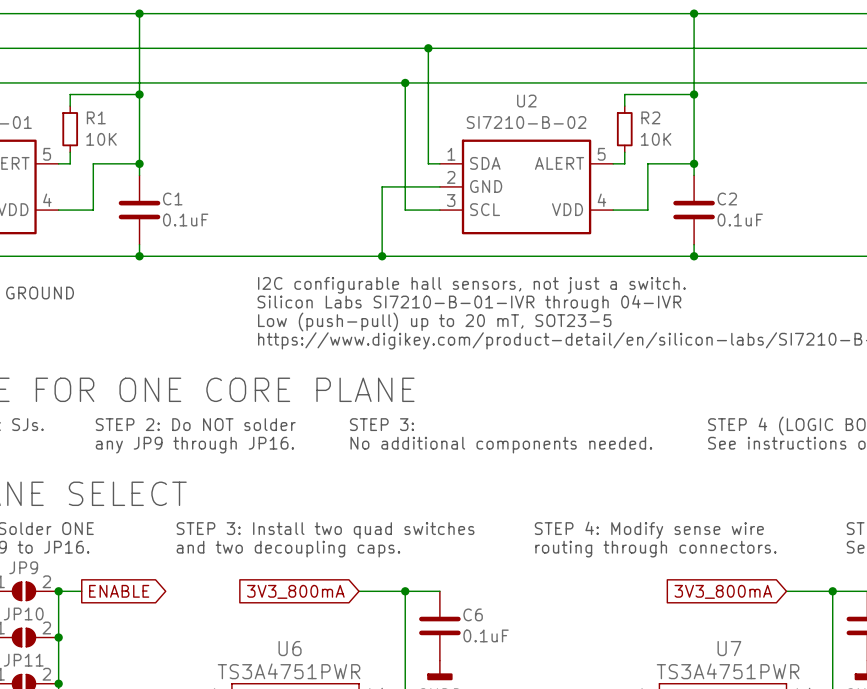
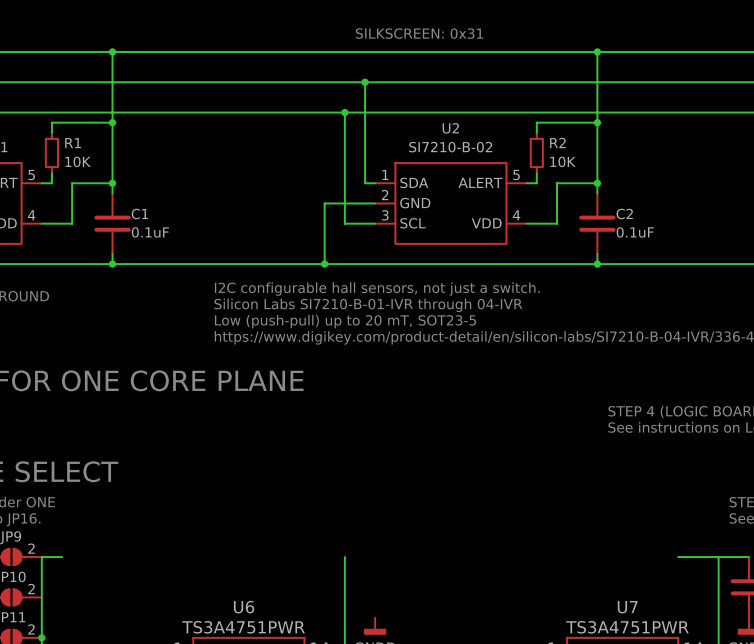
text: STEP 2: Do NOT solder (195, 424) -> none
text: STEP 3: (381, 424) -> none
text: any JP9 through JP16. (194, 445) -> none
text: No additional components needed. (501, 445) -> none
text: STEP 3: Install two quad switches (325, 530) -> none
text: STEP 4: Modify sense wire (649, 530) -> none
text: and two decoupling caps. (288, 549) -> none
text: routing through connectors. (655, 549) -> none
junction: (58, 591) -> none
global label: ENABLE (119, 591) -> none
global label: 3V3_800mA (295, 591) -> none
wire: (359, 591) (439, 591) -> none
junction: (405, 591) -> none
global label: 3V3_800mA (723, 591) -> none
junction: (832, 591) -> none
C6: 0.1uF (439, 625) -> none
junction: (58, 637) -> none

